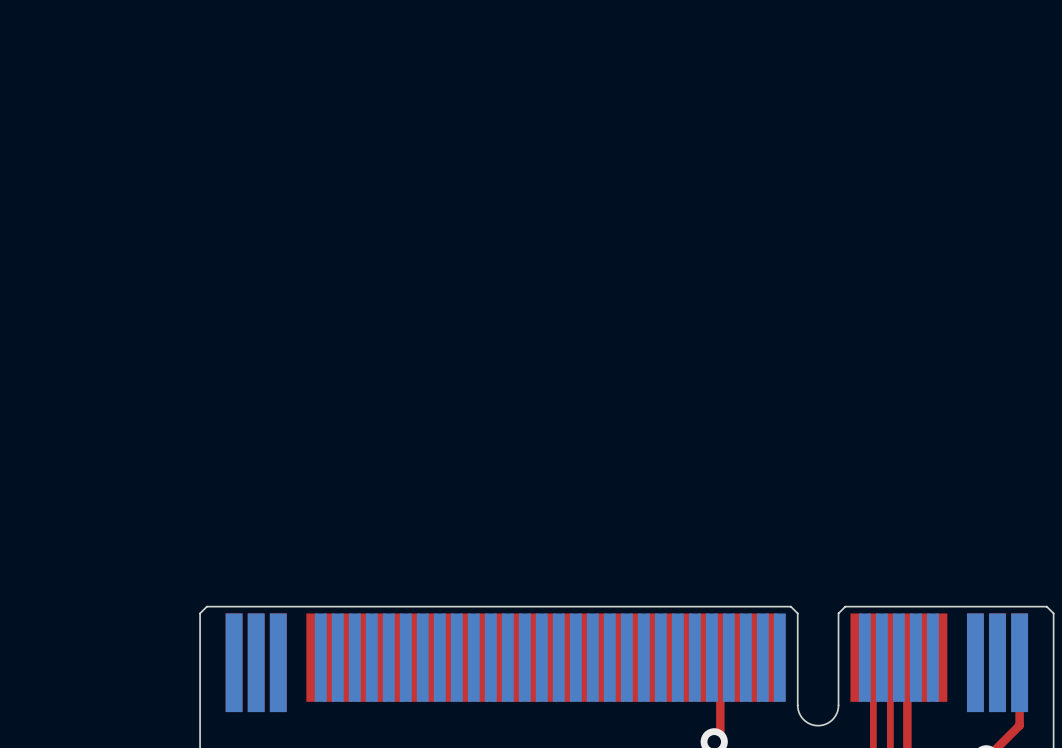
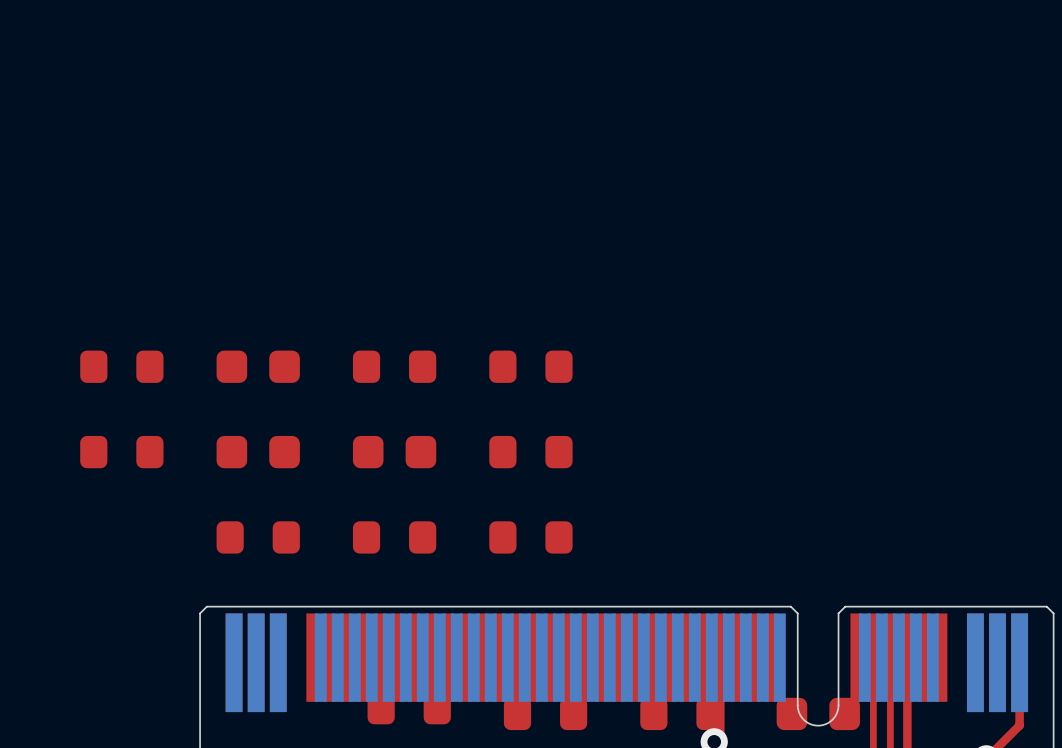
part: none -> (121, 366)
part: none -> (258, 366)
part: none -> (394, 366)
part: none -> (530, 366)
part: none -> (121, 452)
part: none -> (258, 452)
part: none -> (394, 452)
part: none -> (530, 452)
part: none -> (258, 537)
part: none -> (394, 537)
part: none -> (530, 537)
part: none -> (409, 708)
part: none -> (545, 713)
part: none -> (681, 713)
part: none -> (818, 713)

